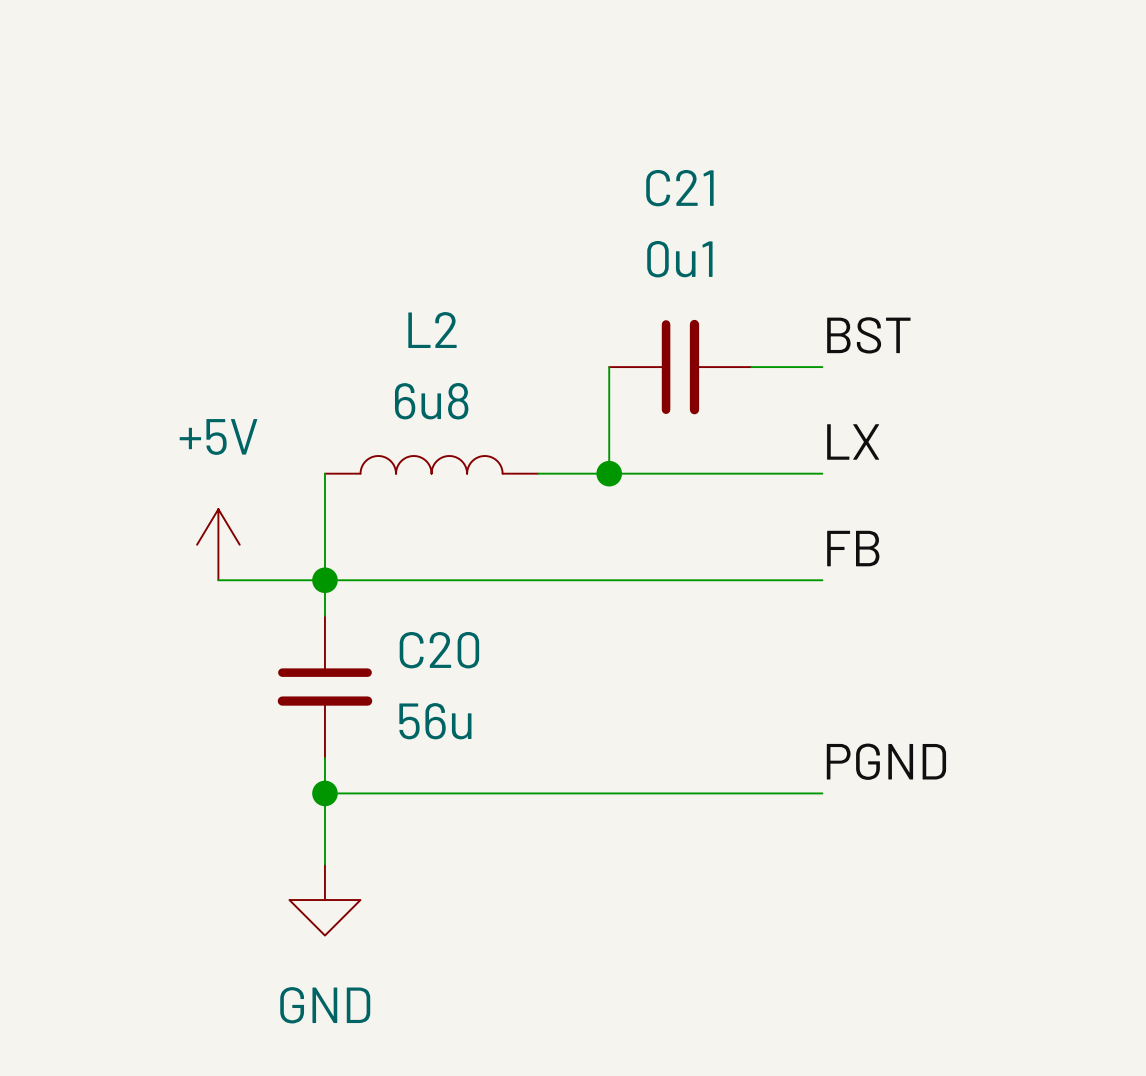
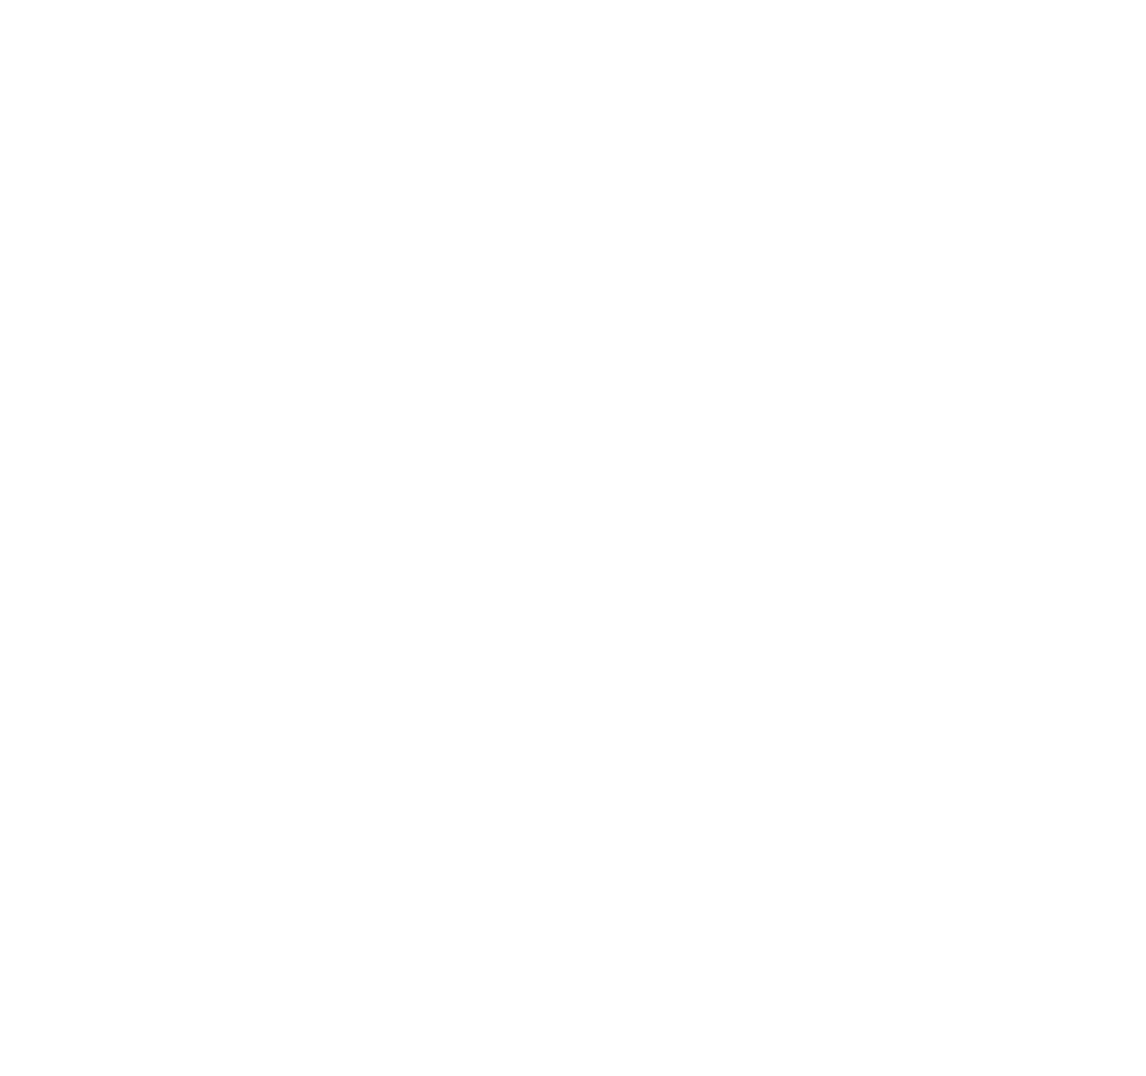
label: BST (868, 335) -> none
wire: (609, 367) (609, 473) -> none
C21: 0u1 (680, 367) -> none
wire: (751, 367) (822, 367) -> none
label: LX (853, 441) -> none
L2: 6u8 (431, 464) -> none
wire: (324, 473) (324, 615) -> none
wire: (538, 473) (822, 473) -> none
junction: (609, 473) -> none
power symbol: +5V (218, 544) -> none
label: FB (853, 548) -> none
wire: (218, 580) (822, 580) -> none
junction: (324, 580) -> none
C20: 56u (324, 686) -> none
wire: (324, 757) (324, 864) -> none
label: PGND (886, 761) -> none
wire: (324, 793) (822, 793) -> none
junction: (324, 793) -> none
power symbol: GND (324, 900) -> none

